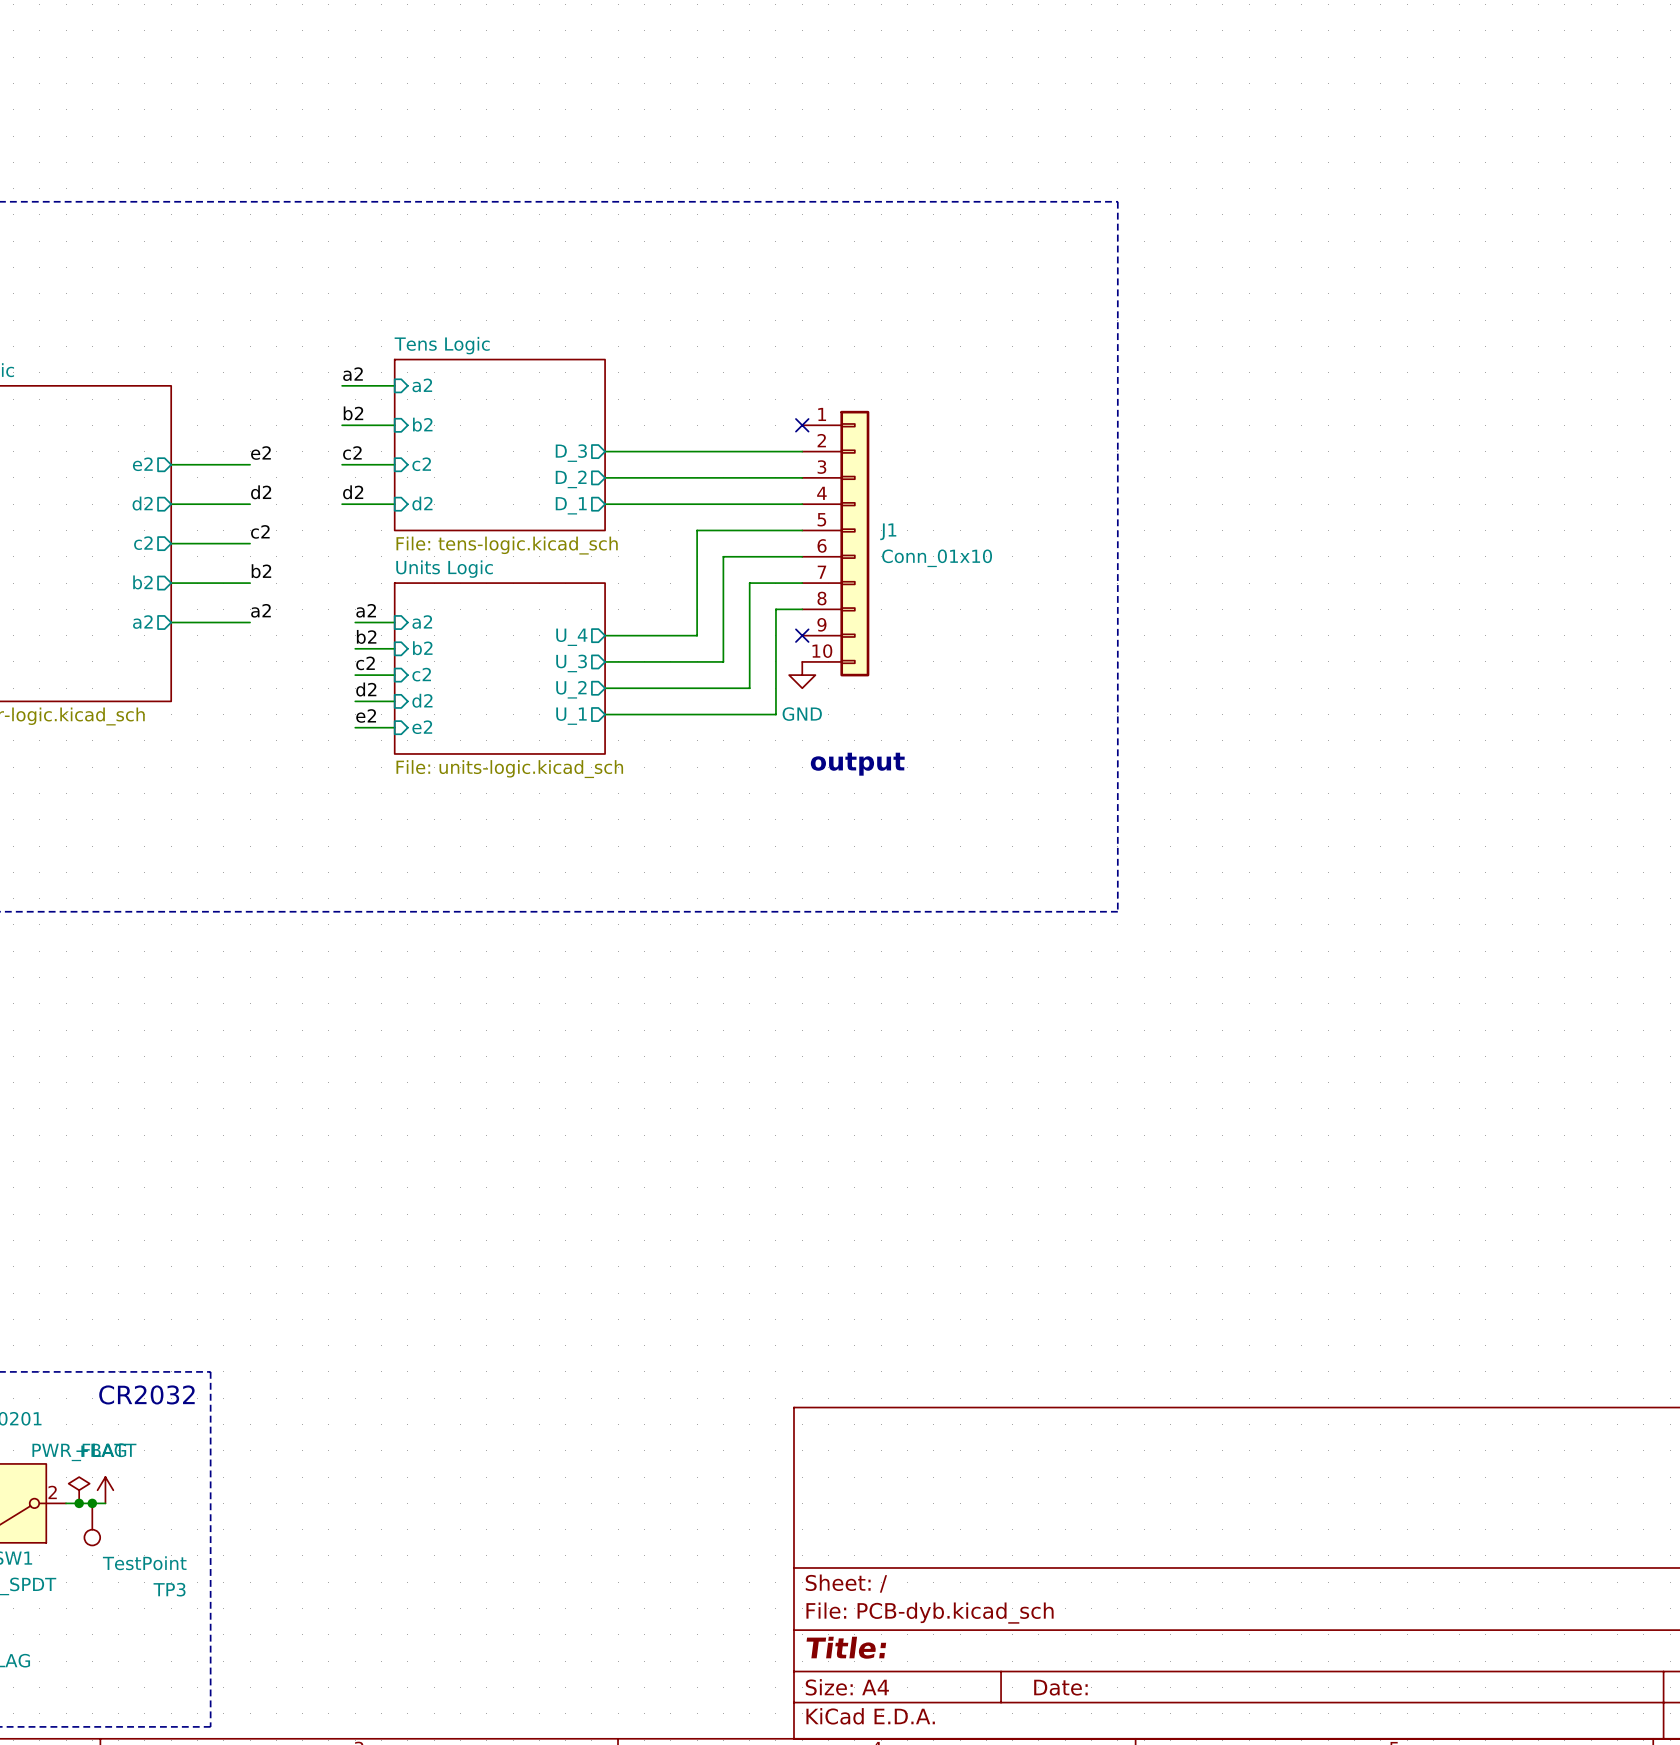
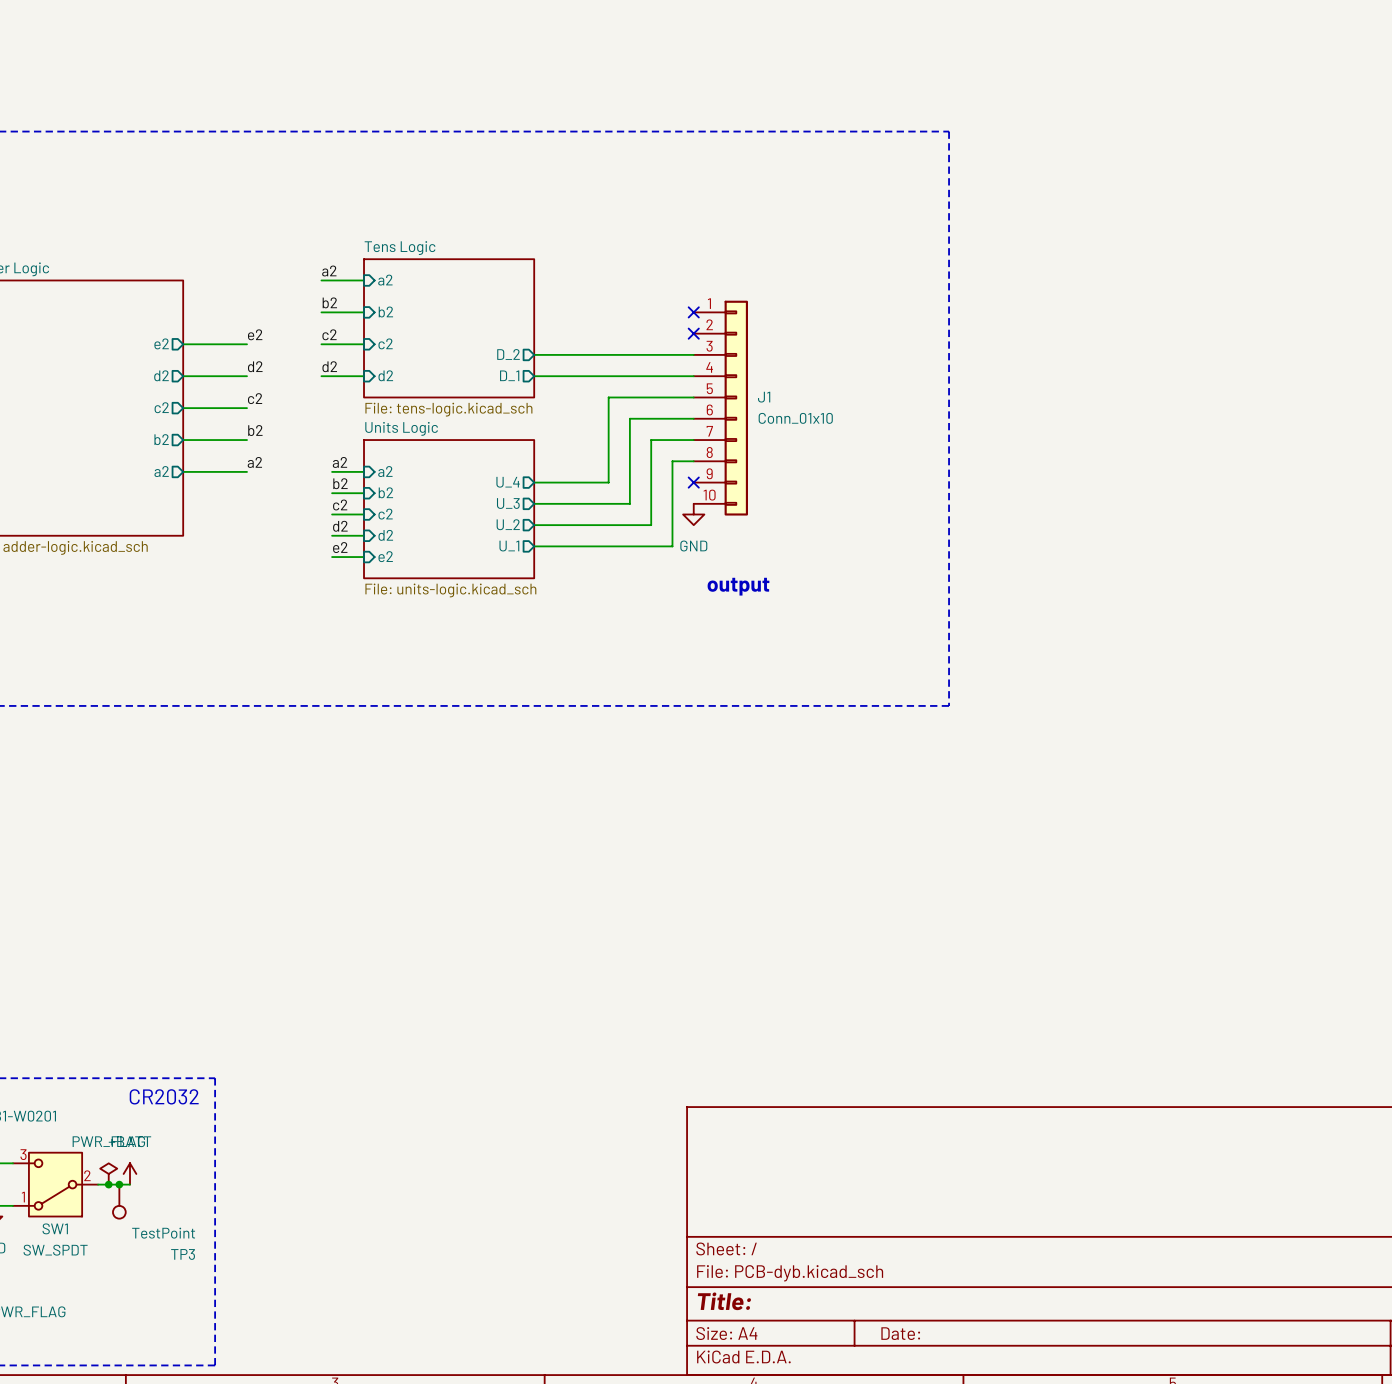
wire: (605, 451) (802, 451) -> none
no-connect mark: none -> (693, 333)
sheet pin: D_3 (571, 453) -> none

